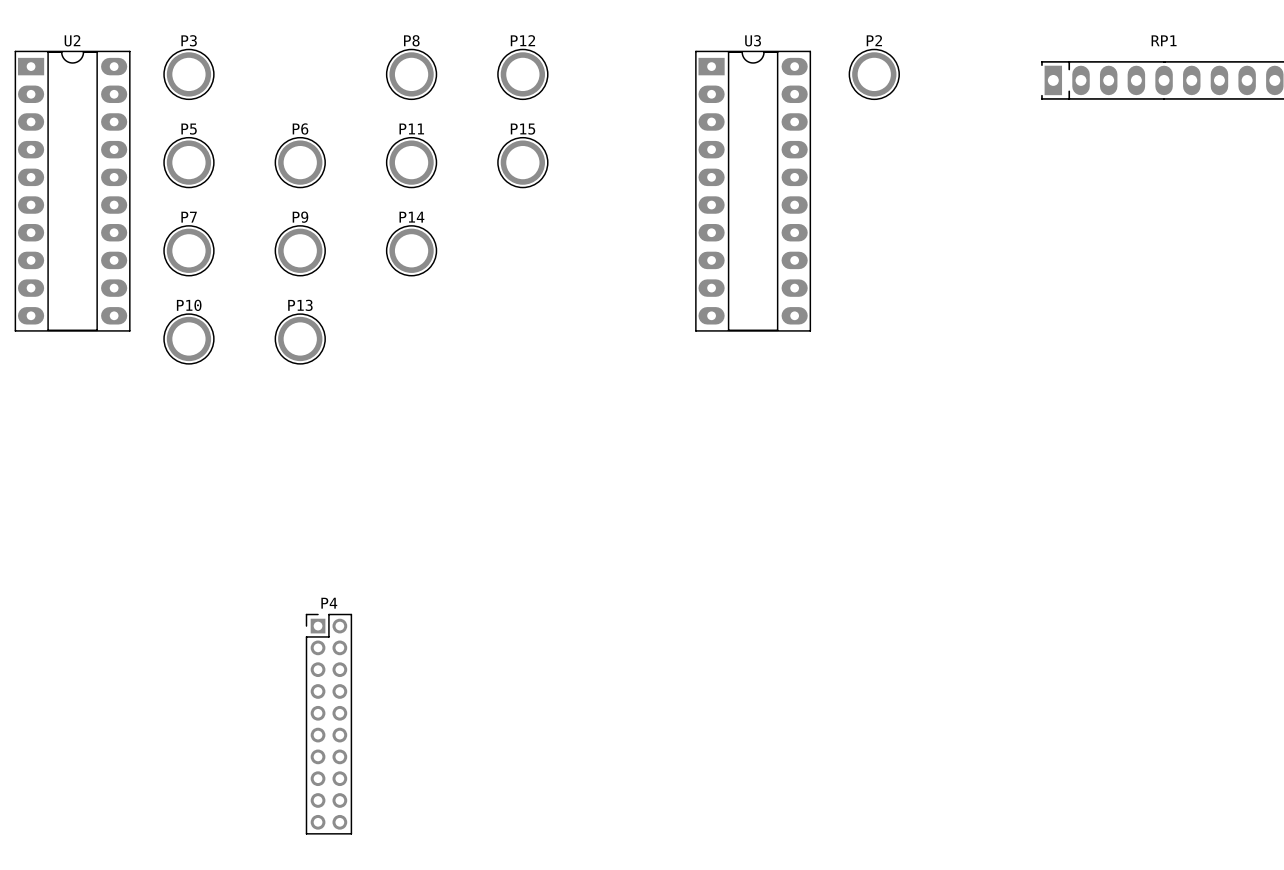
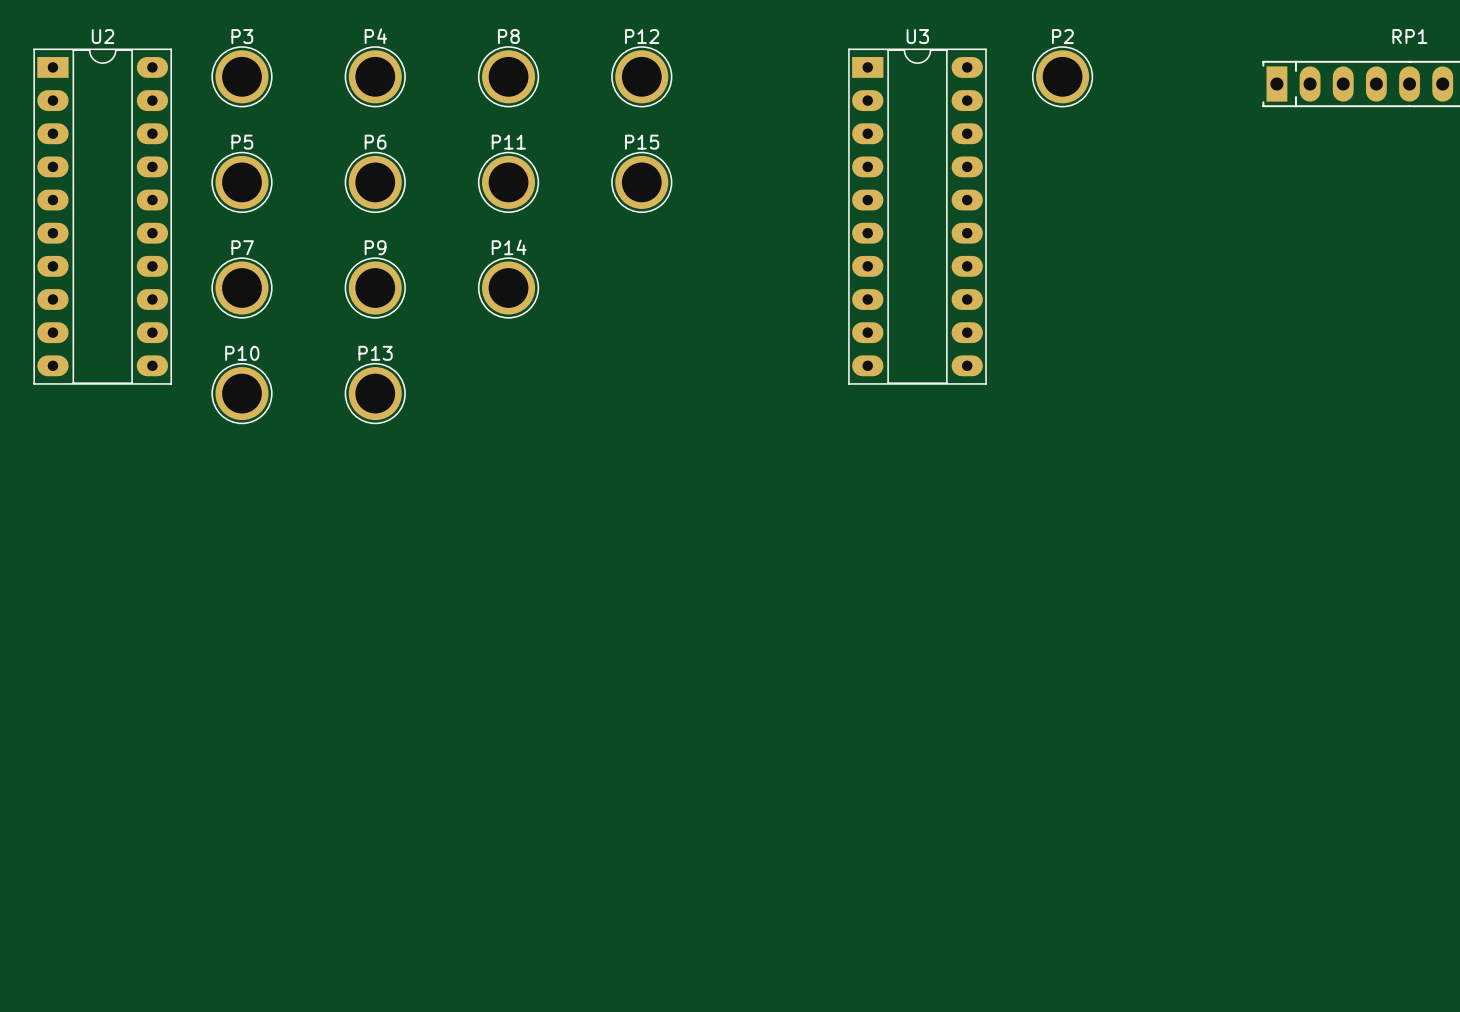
P4 name position: P4 (329, 603) -> P4 (375, 36)
P4 footprint: [305, 613, 353, 835] -> [344, 46, 406, 108]

